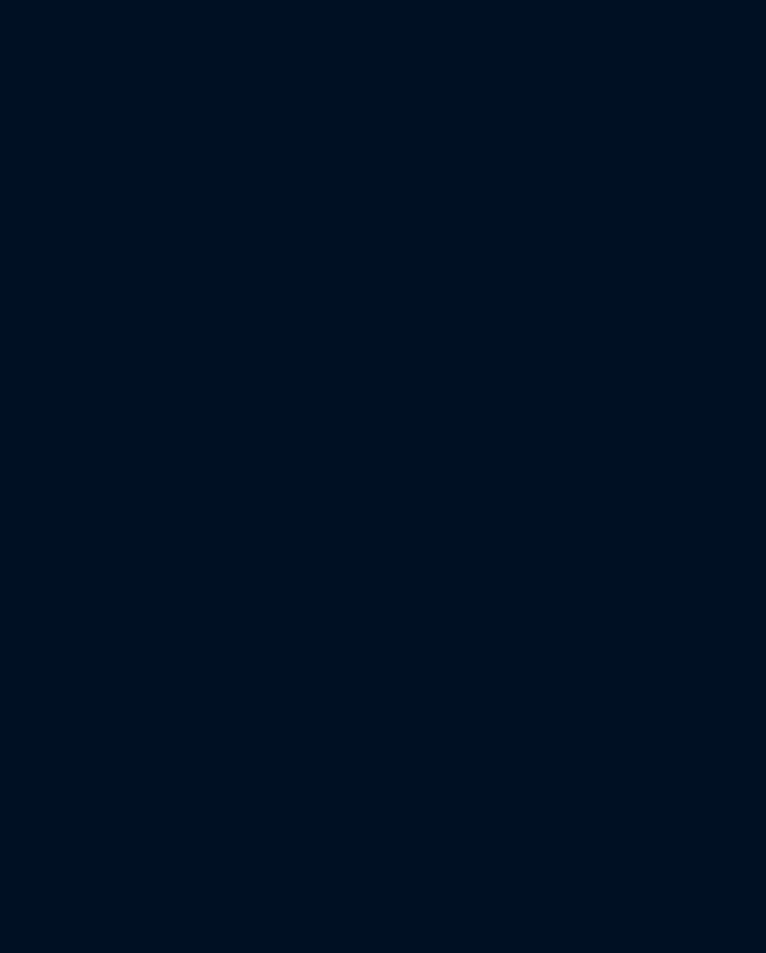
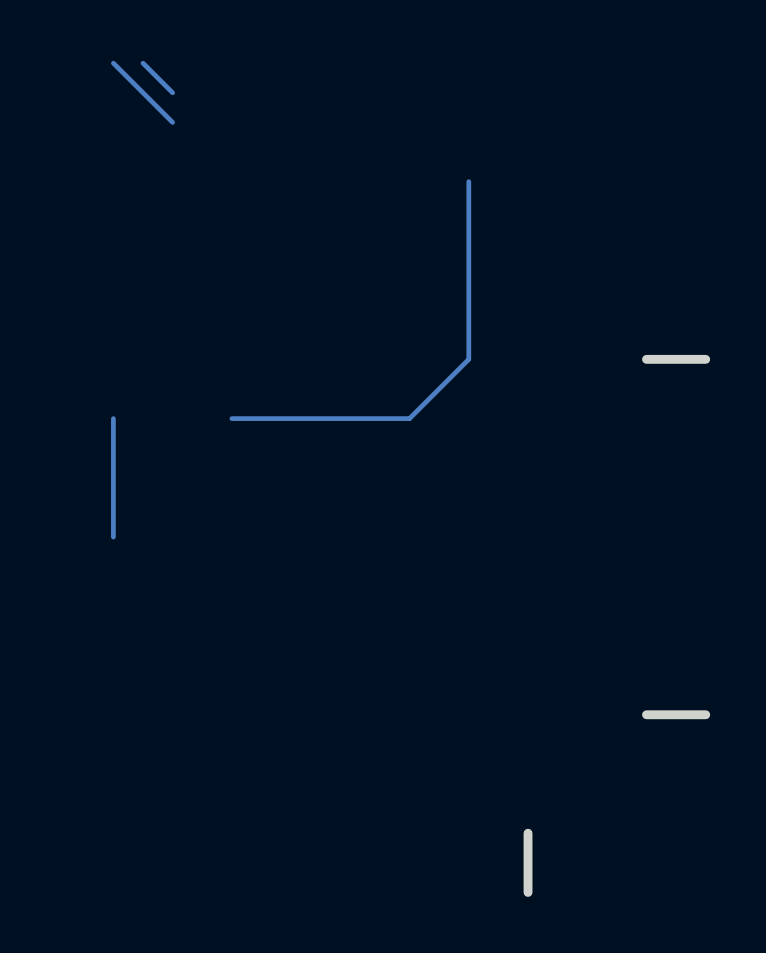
bottom track: none -> (113, 63) (172, 122)
bottom track: none -> (143, 63) (172, 92)
bottom track: none -> (468, 181) (468, 359) (409, 418) (231, 418)
board edge: none -> (646, 359) (705, 359)
bottom track: none -> (113, 418) (113, 537)
board edge: none -> (646, 714) (705, 714)
board edge: none -> (528, 833) (528, 892)

